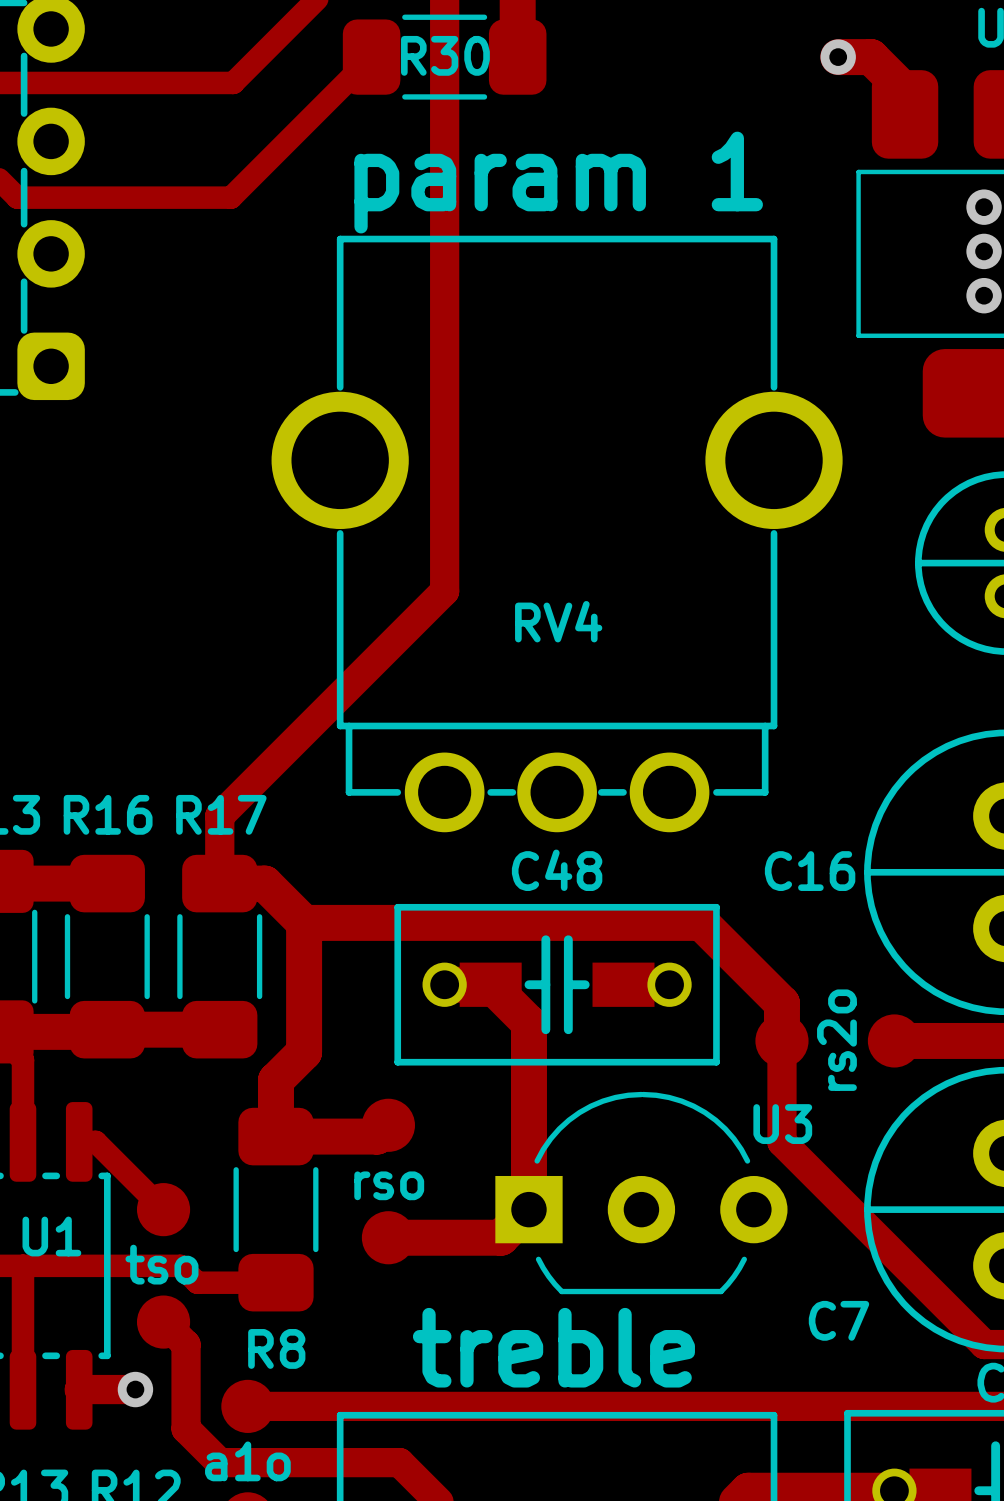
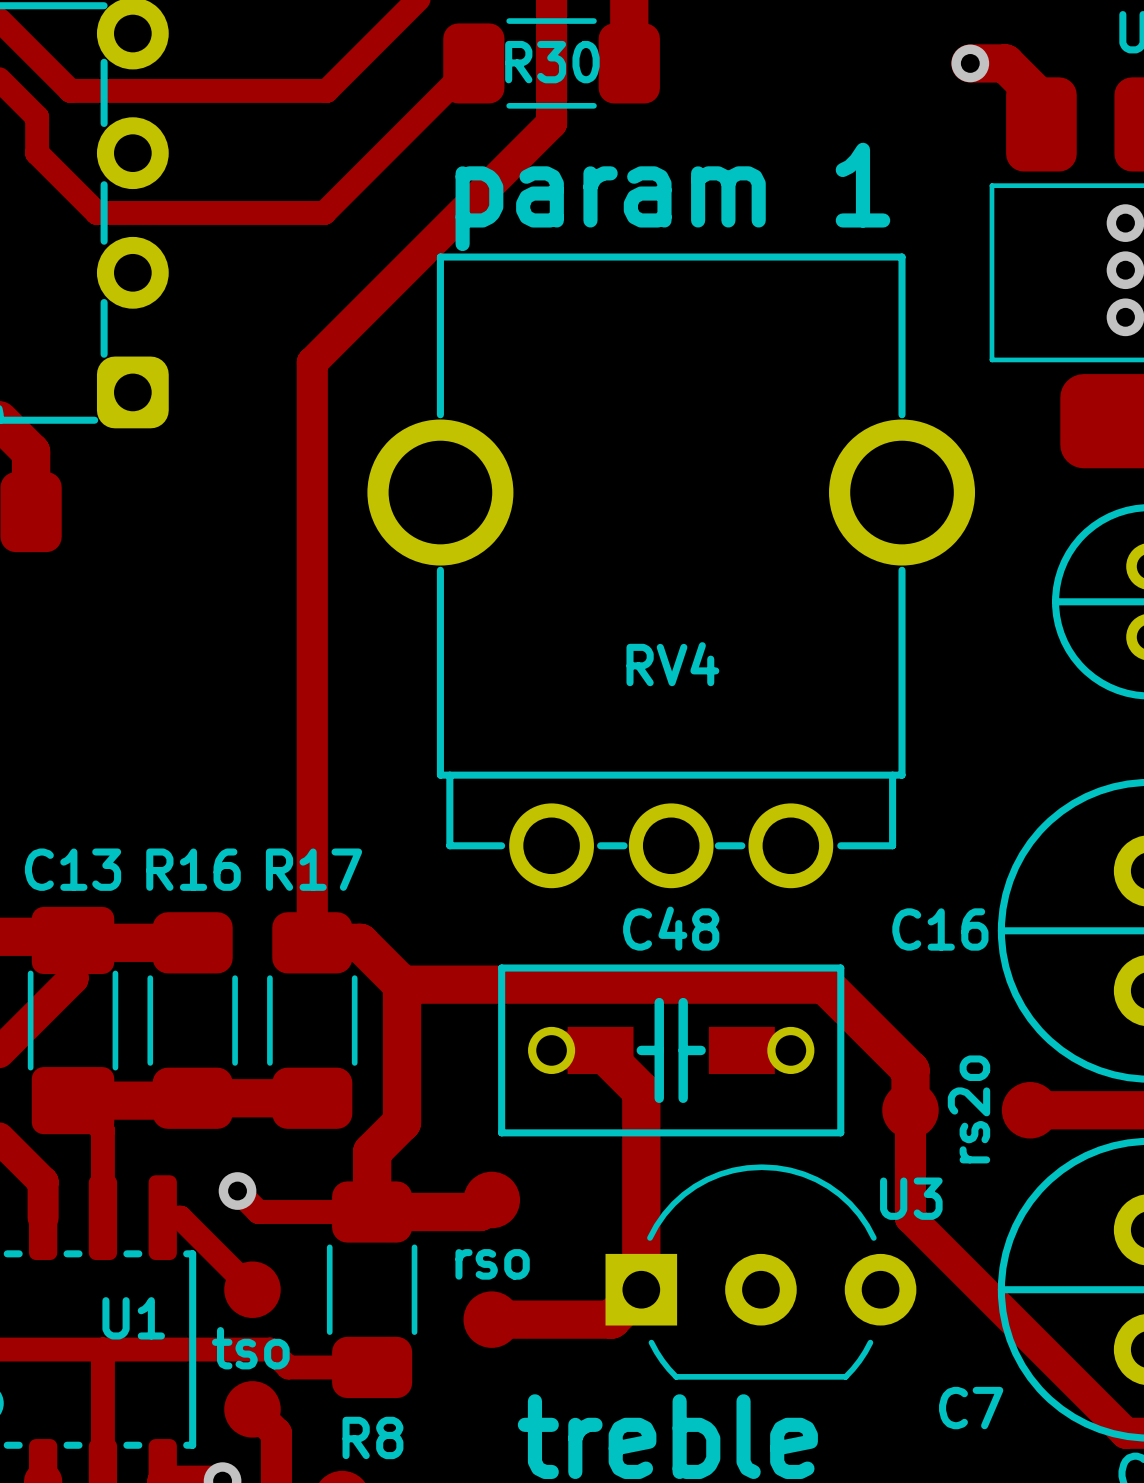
track: (444, 113) (444, 591) (219, 816) -> (551, 123) (312, 362) (312, 870)
track: none -> (237, 1191) (258, 1212) (372, 1212)
via: none -> (237, 1191)

